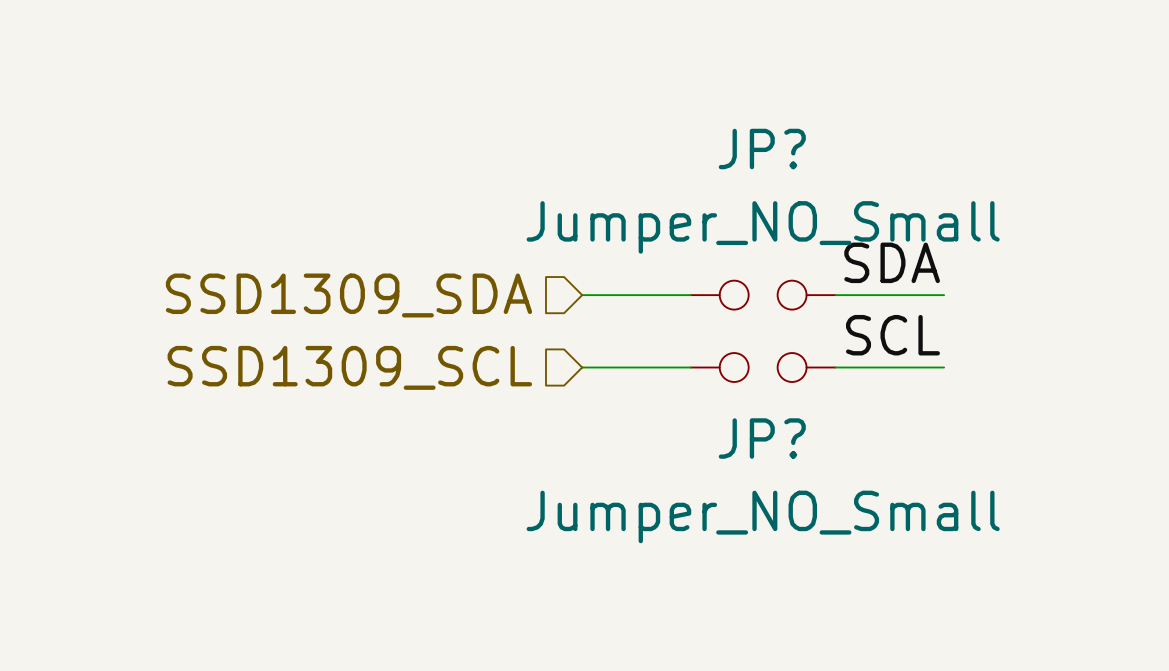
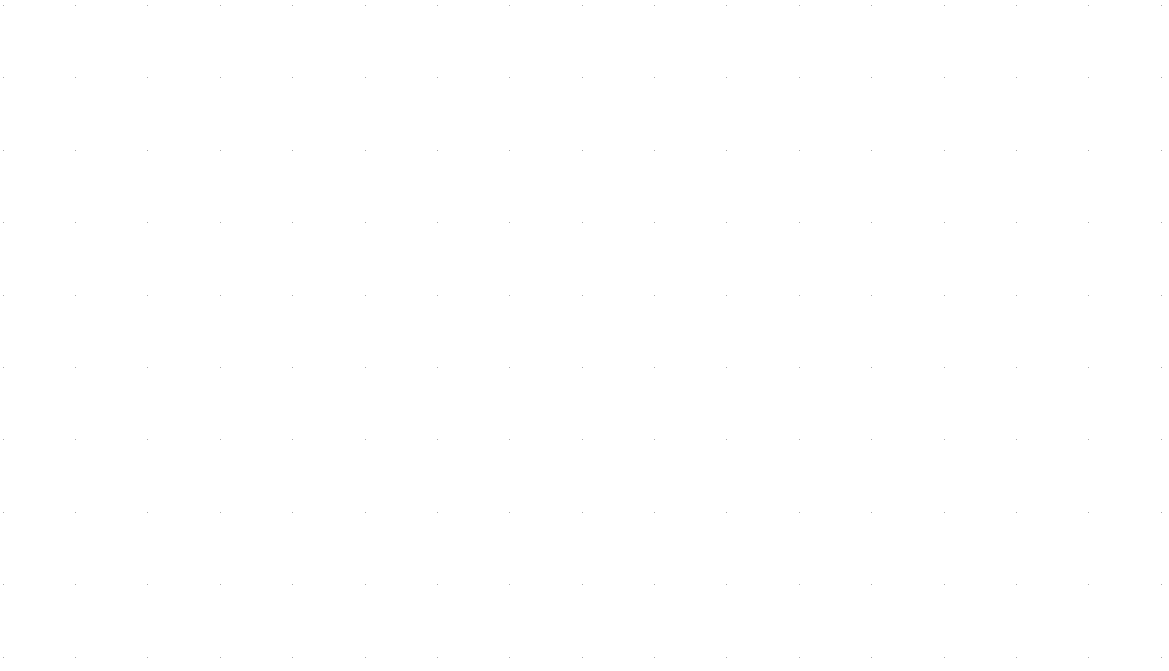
label: SDA (892, 262) -> none
hierarchical label: SSD1309_SDA (348, 295) -> none
wire: (582, 295) (690, 295) -> none
JP?: Jumper_NO_Small (763, 295) -> none
wire: (835, 295) (944, 295) -> none
label: SCL (892, 335) -> none
hierarchical label: SSD1309_SCL (349, 367) -> none
wire: (582, 367) (690, 367) -> none
JP?: Jumper_NO_Small (763, 367) -> none
wire: (835, 367) (944, 367) -> none

